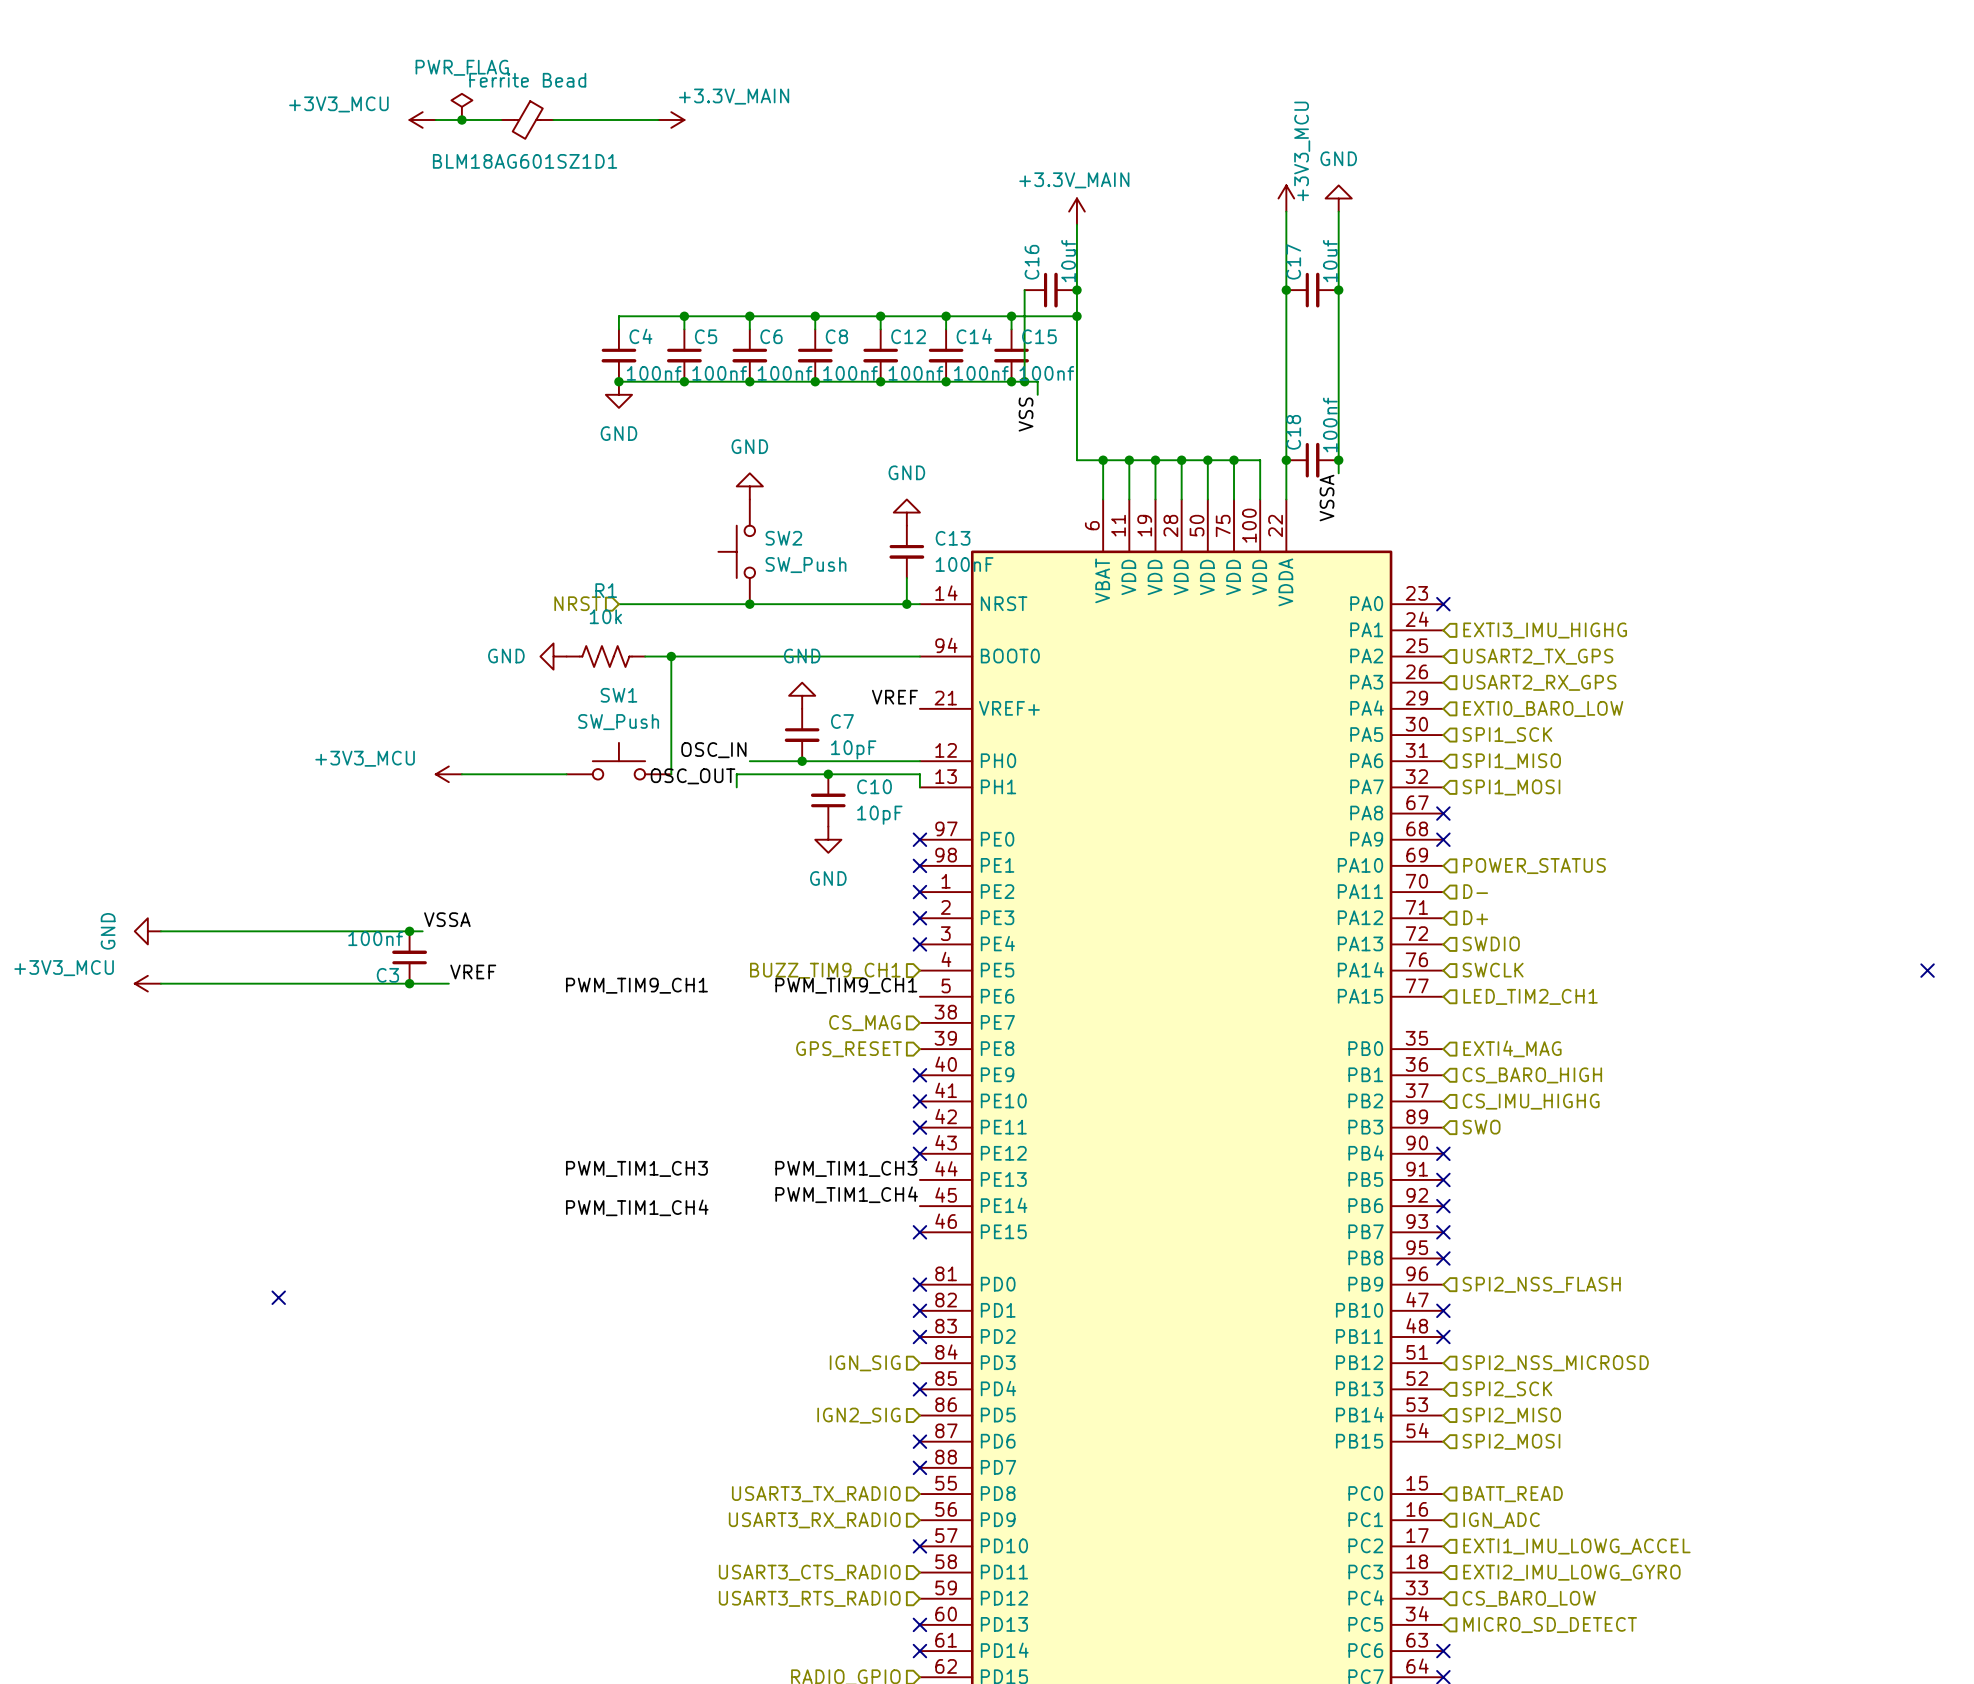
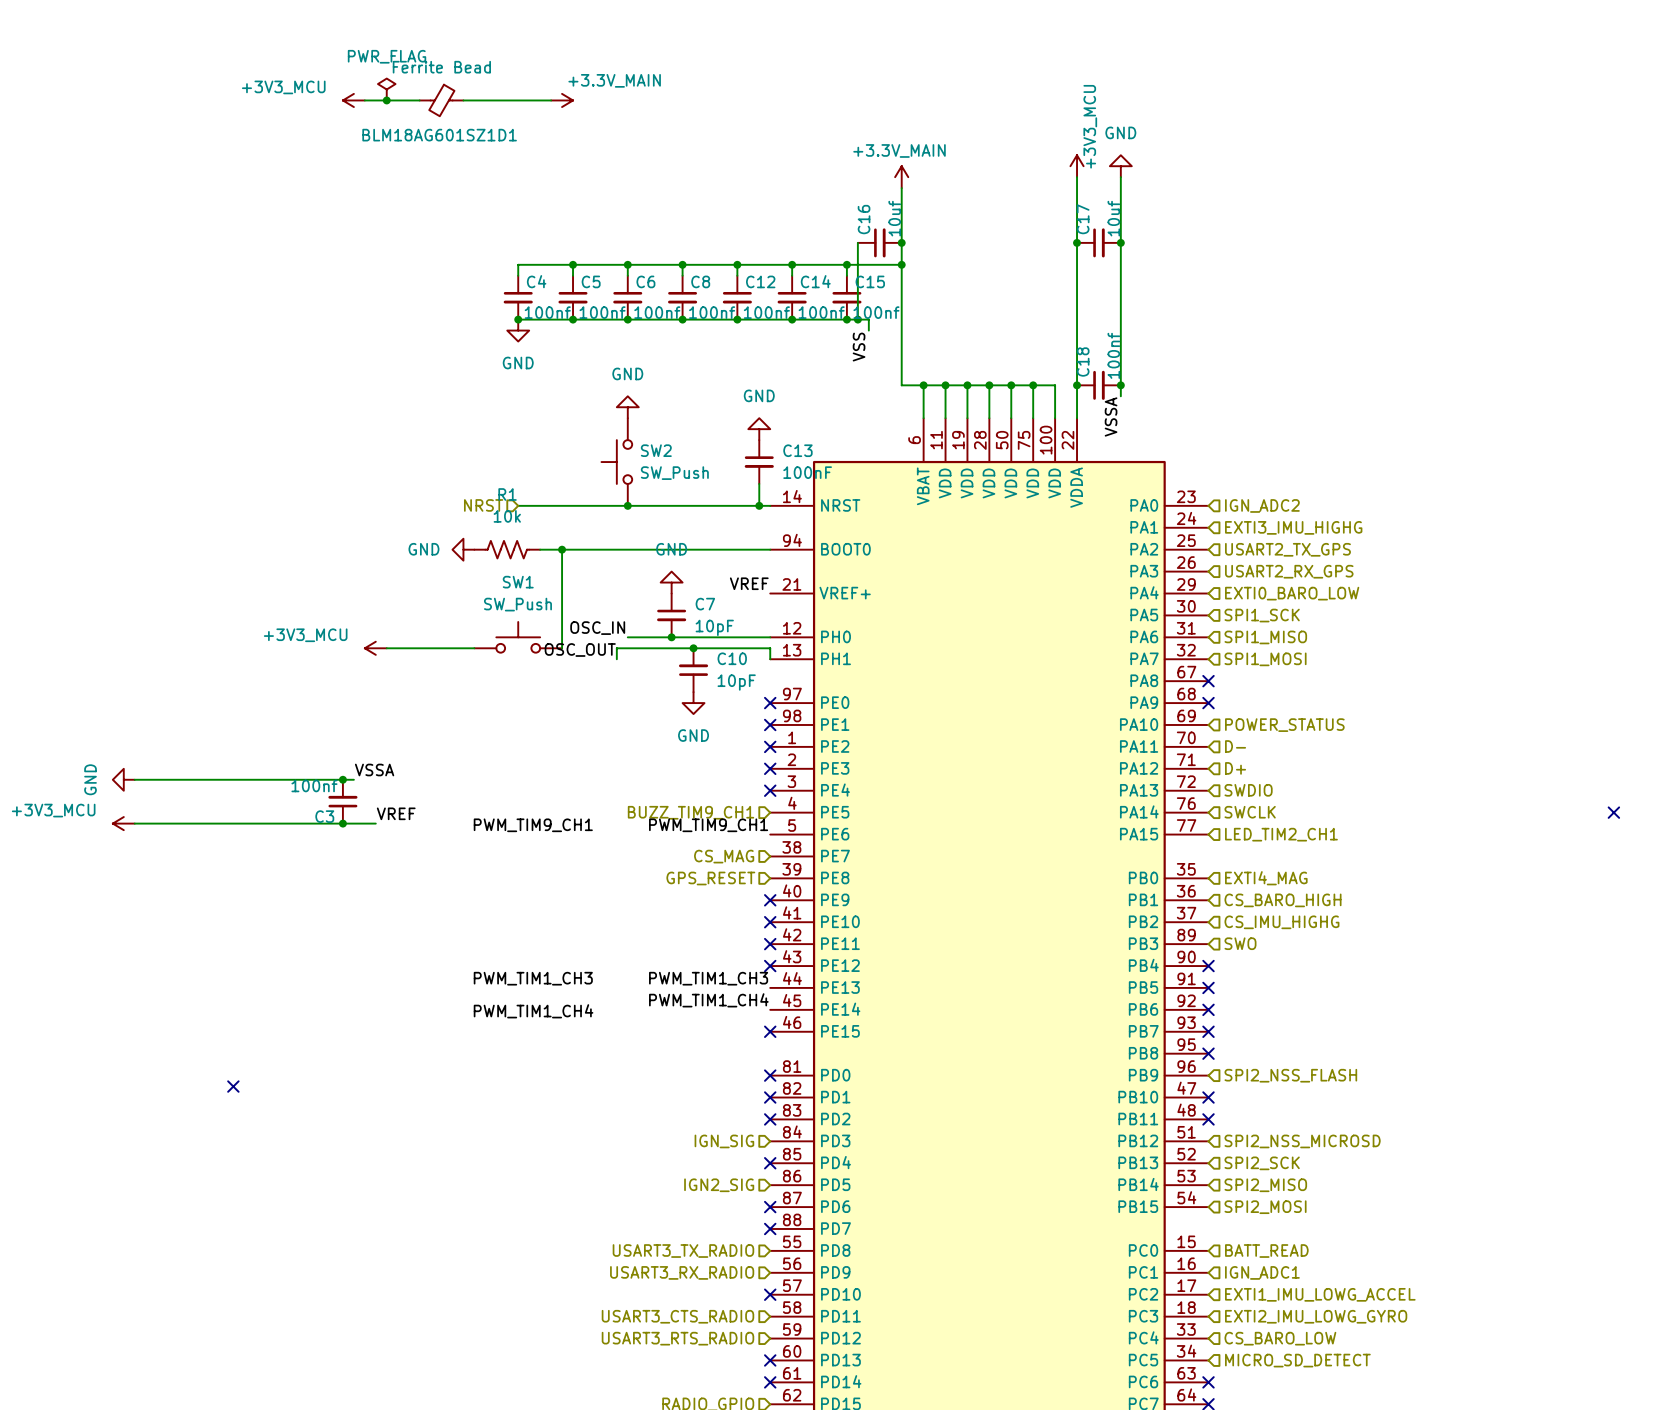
no-connect mark: (1443, 604) -> none
hierarchical label: none -> IGN_ADC2 (1262, 505)
hierarchical label: IGN_ADC (1501, 1520) -> IGN_ADC1 (1262, 1272)

